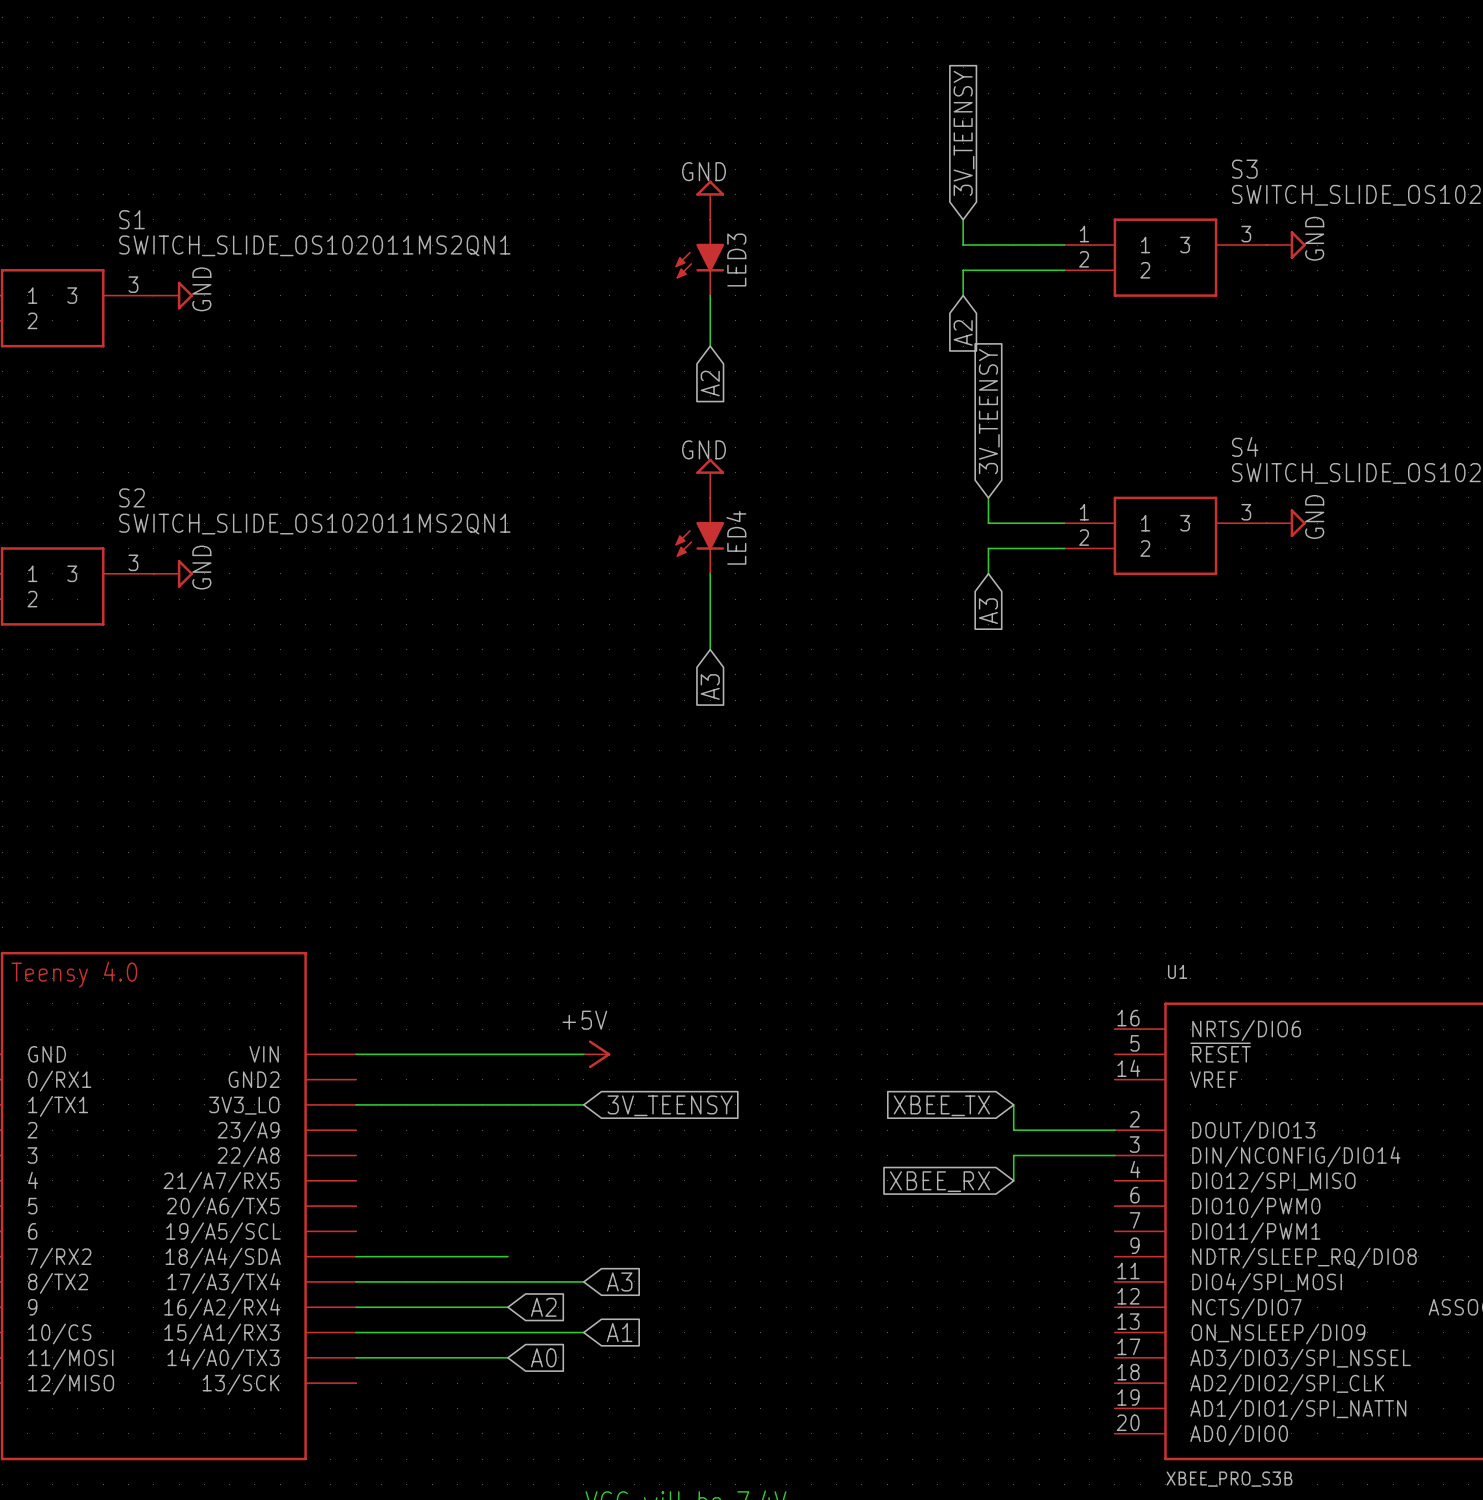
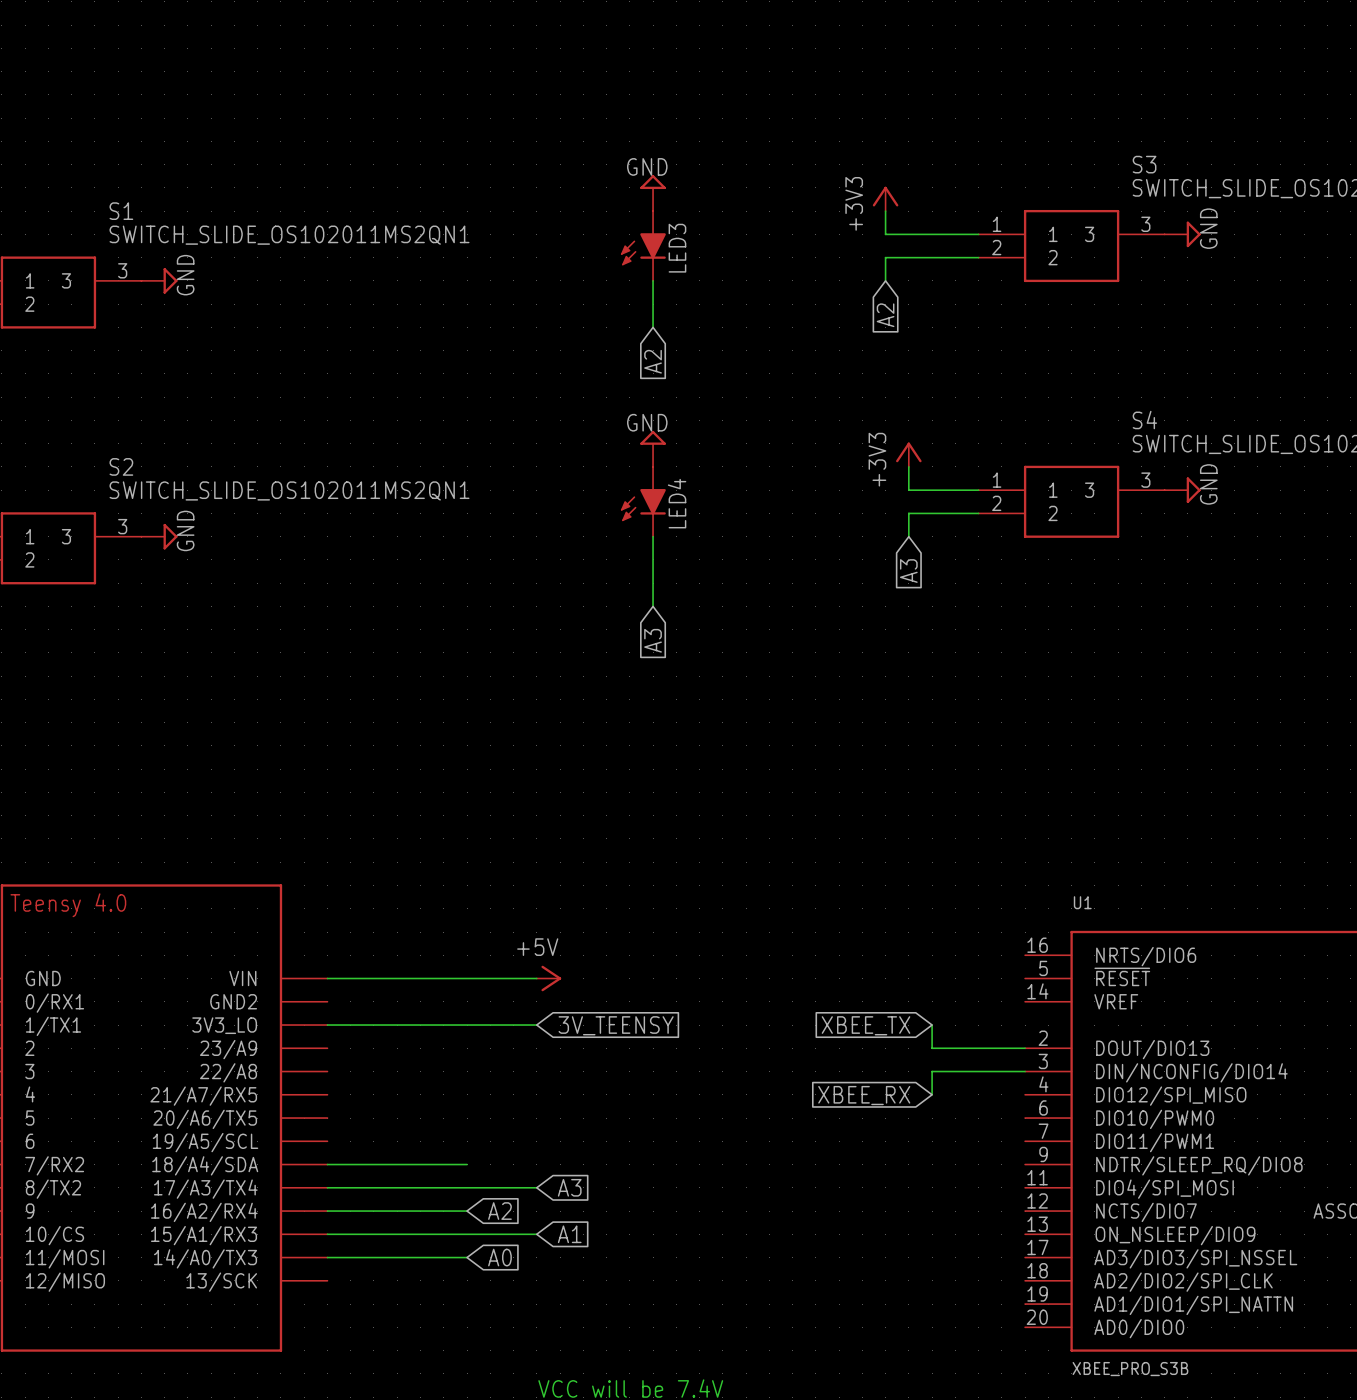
global label: 3V_TEENSY (964, 133) -> none
power symbol: none -> +3V3 (885, 198)
global label: 3V_TEENSY (989, 411) -> none
power symbol: none -> +3V3 (908, 454)

